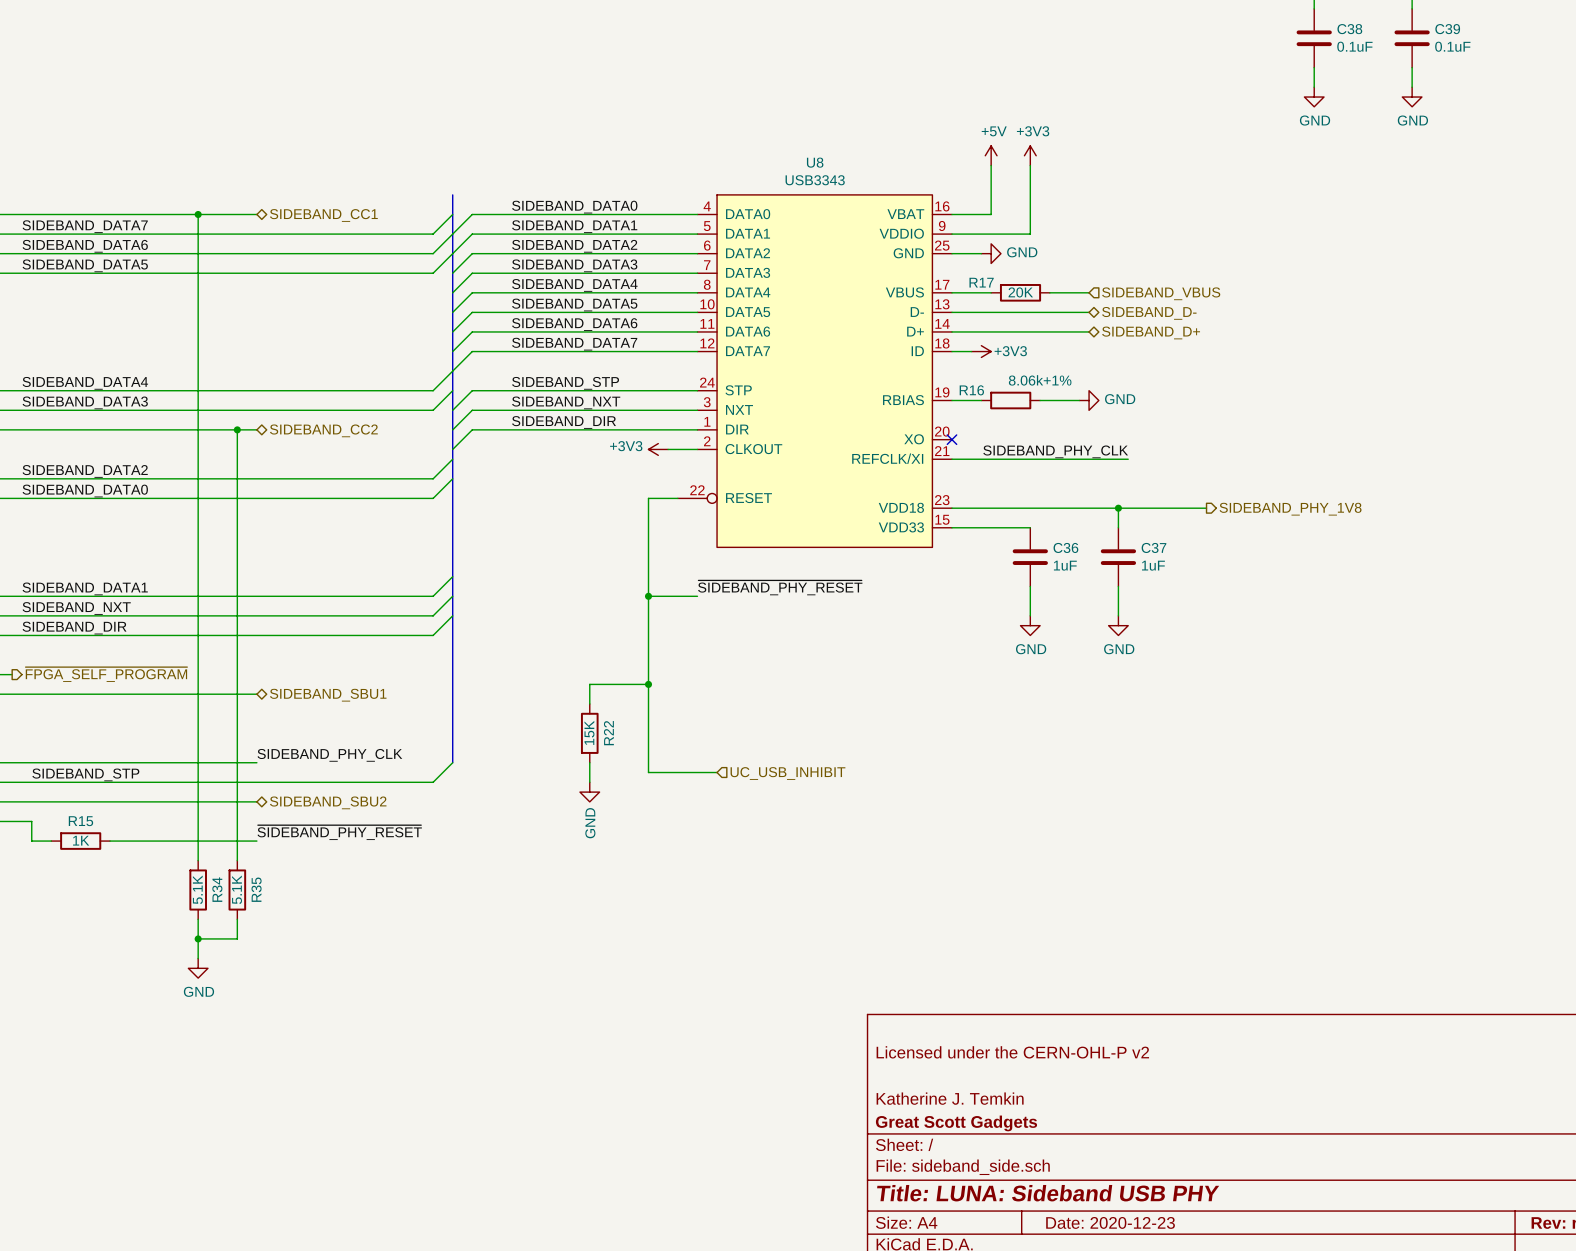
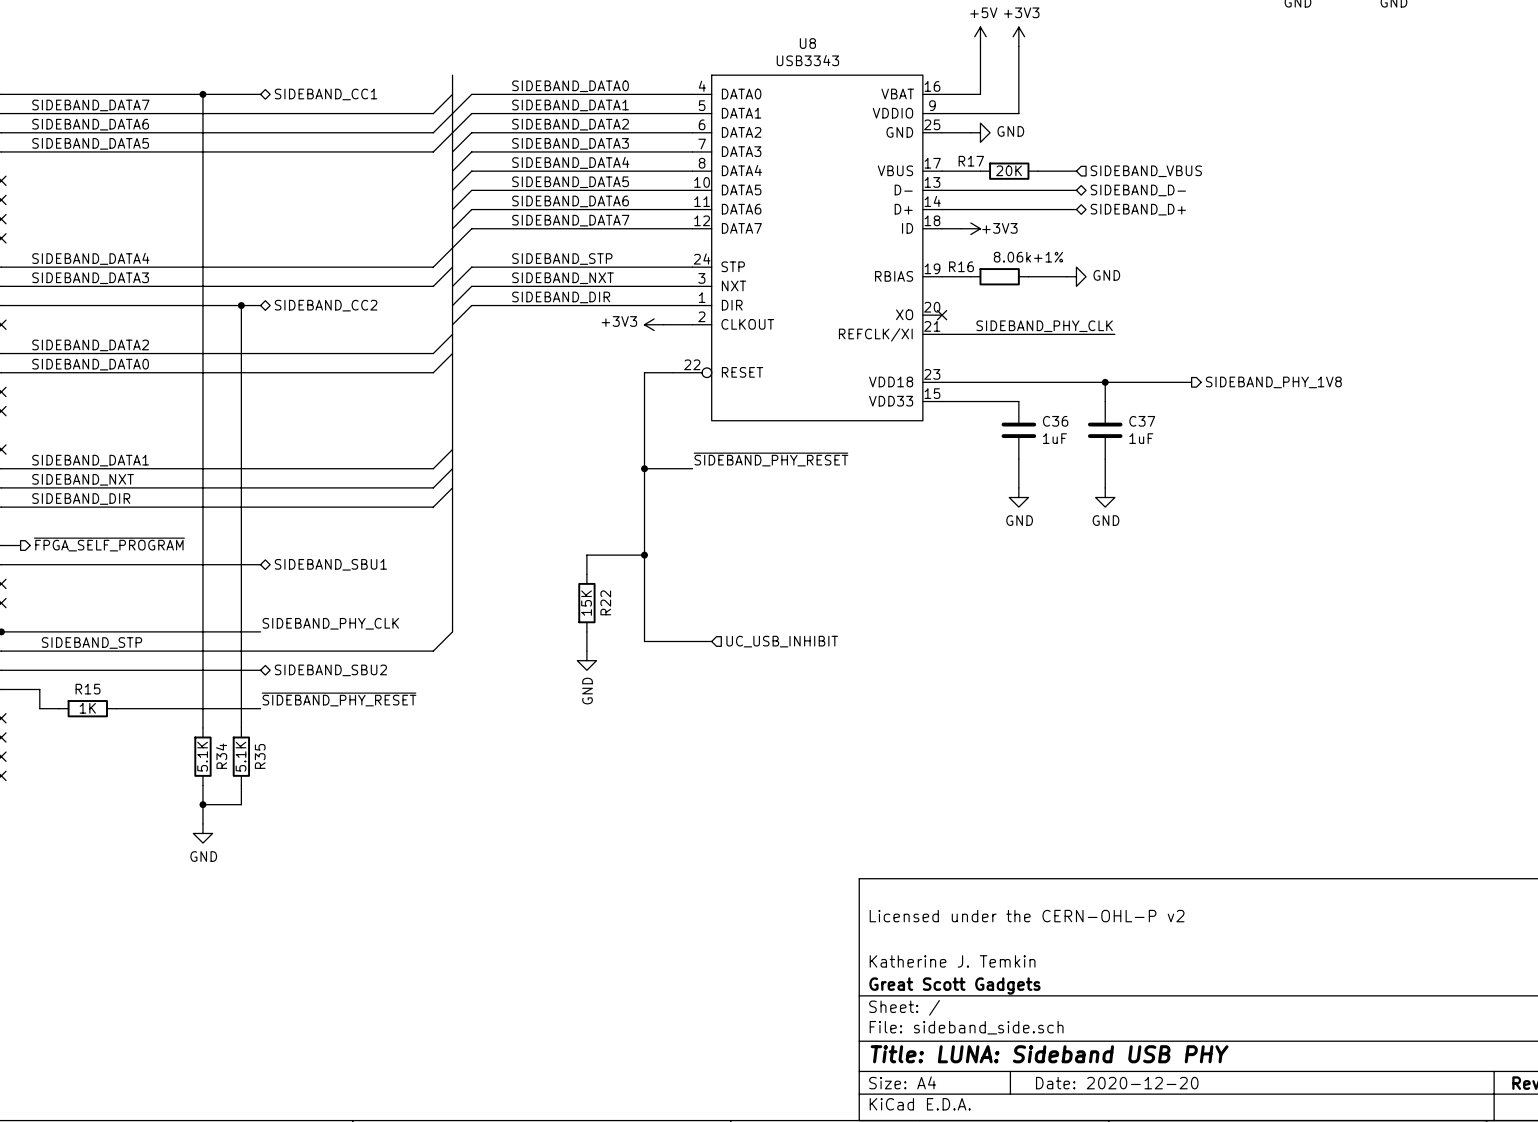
title block: Date: 2020-12-23 (1110, 1222) -> Date: 2020-12-20 (1117, 1083)

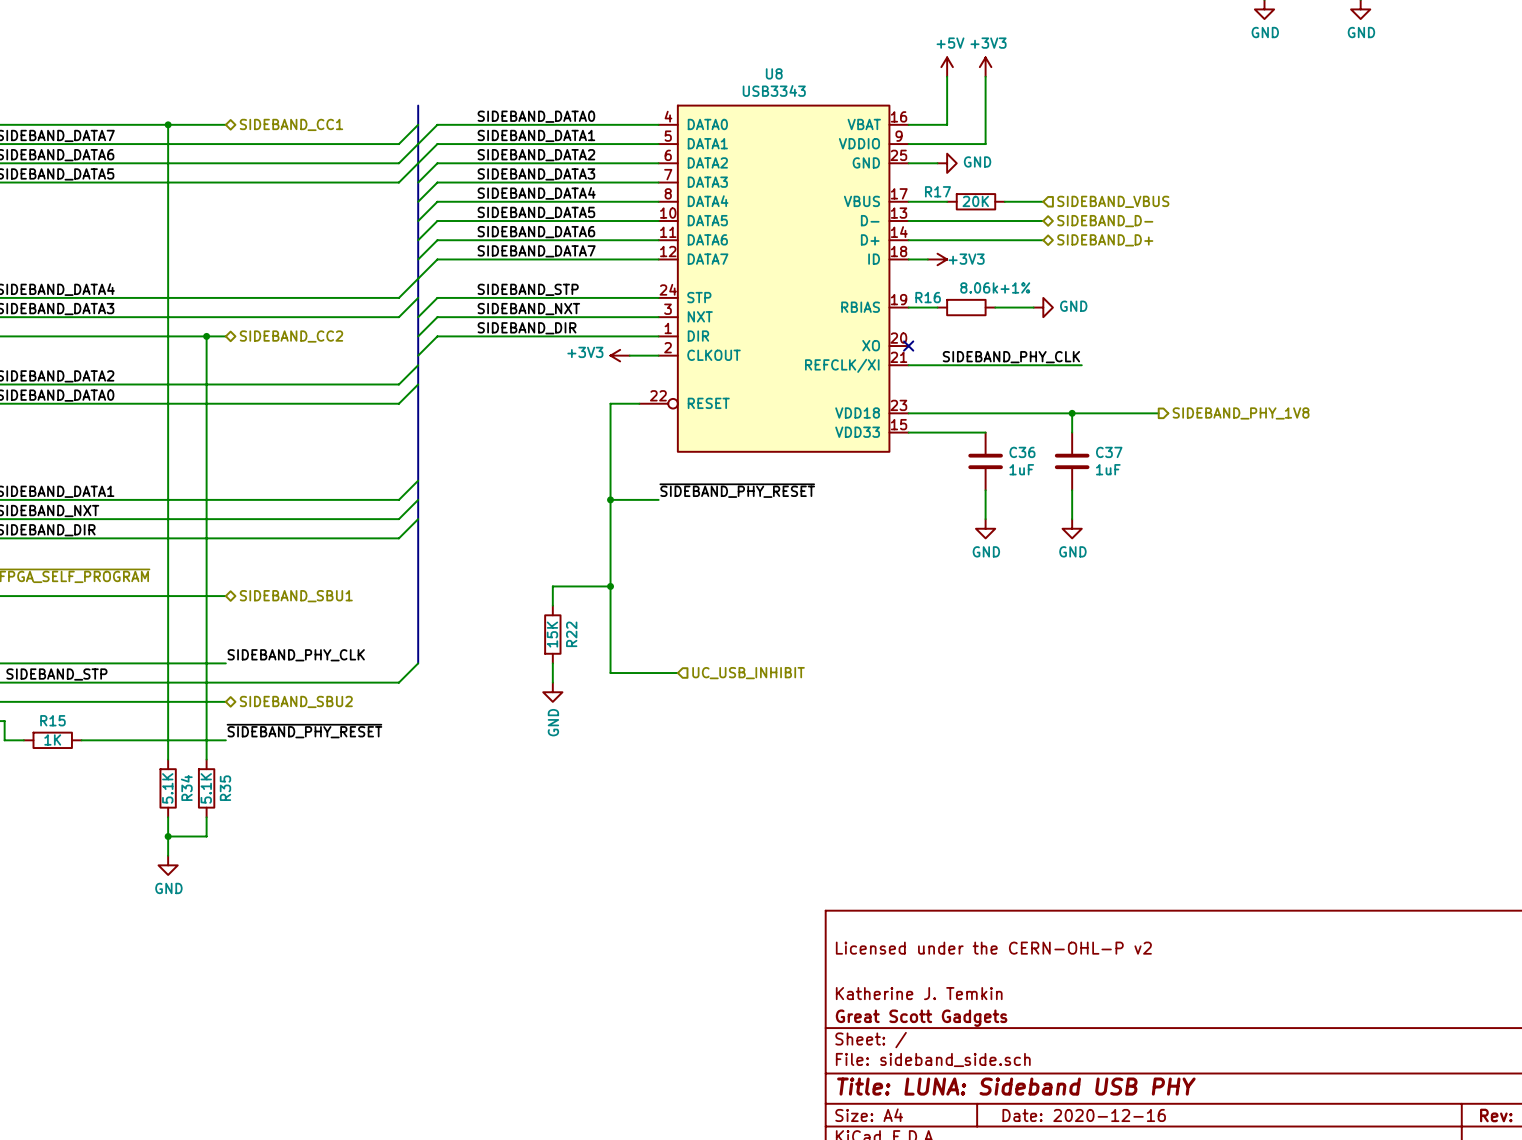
title block: Date: 2020-12-20 (1117, 1083) -> Date: 2020-12-16 (1084, 1115)

